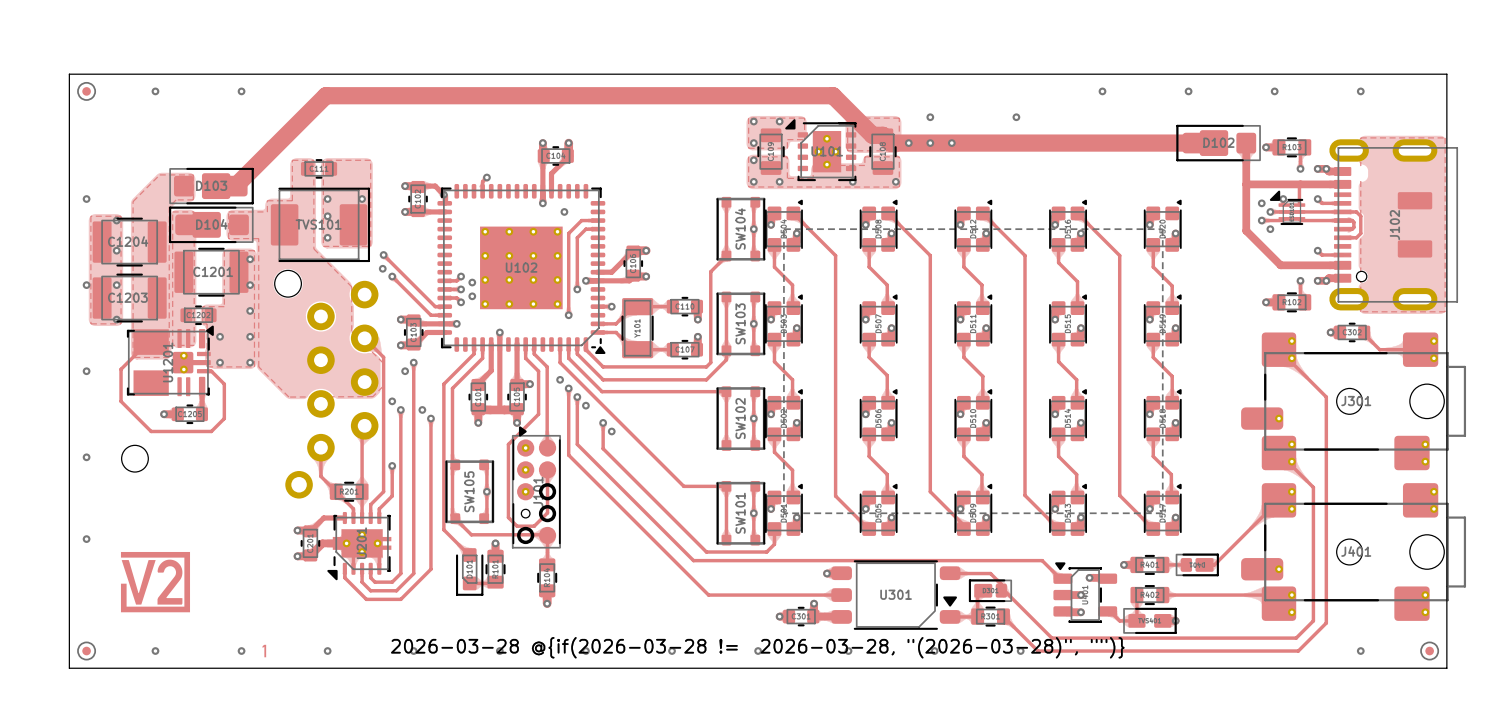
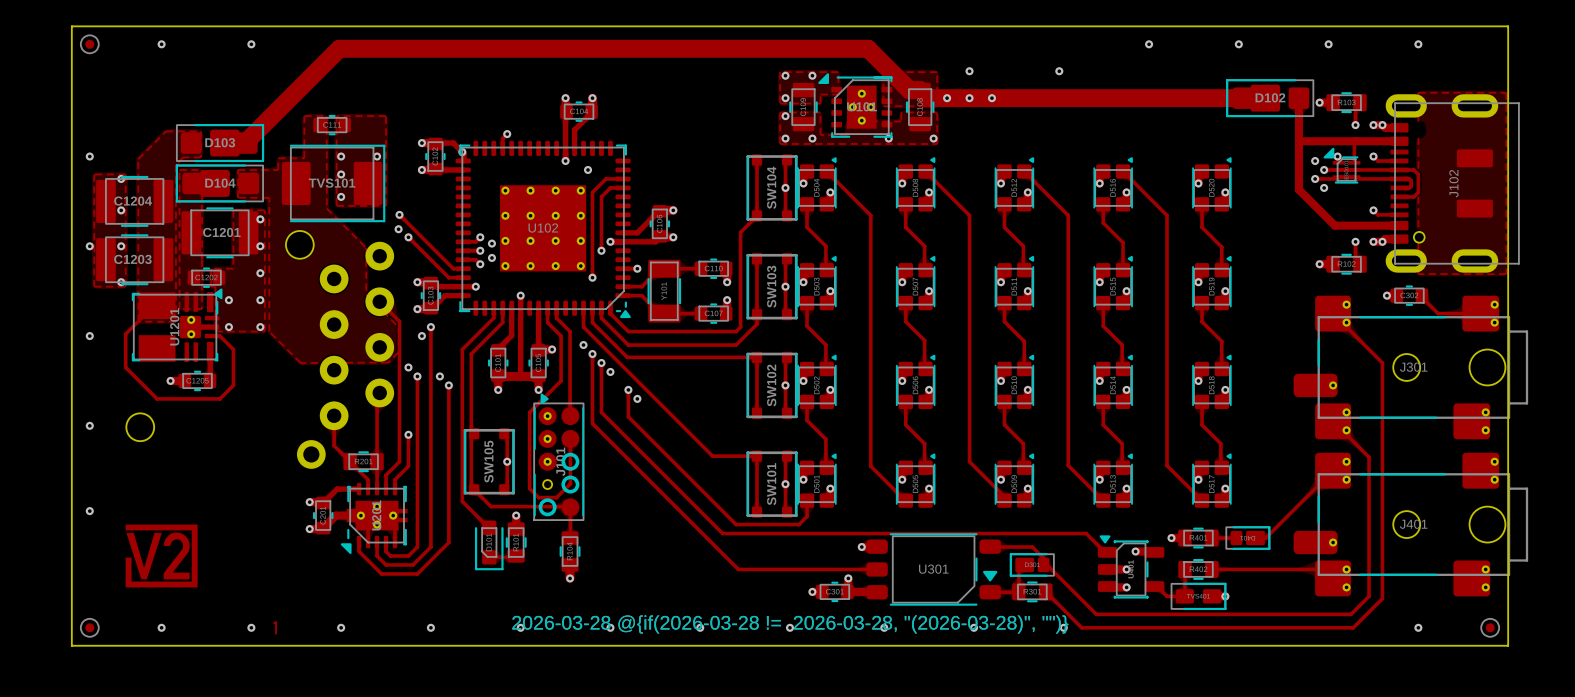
line: (783, 229) (1162, 229) (1162, 513) (783, 513) (783, 229) -> none

